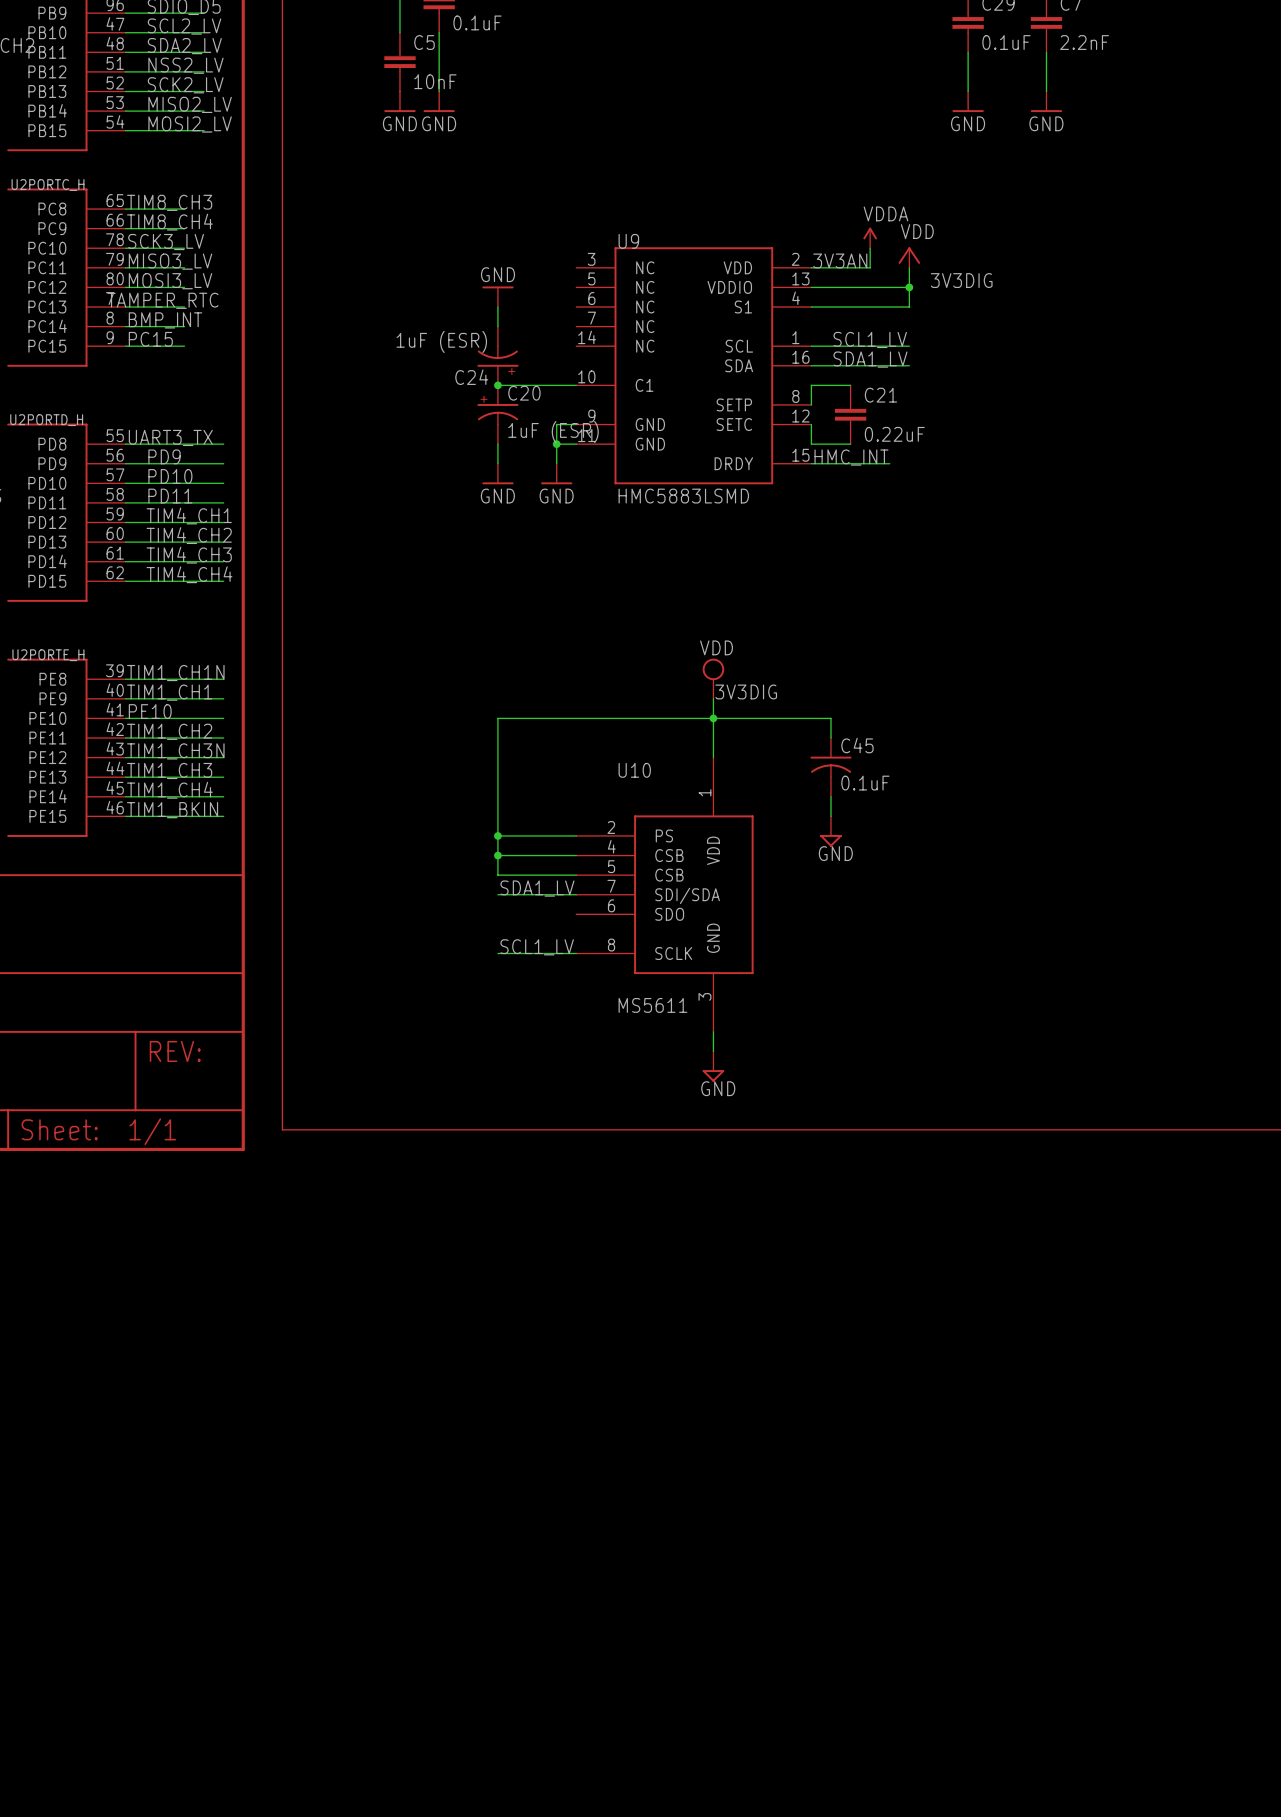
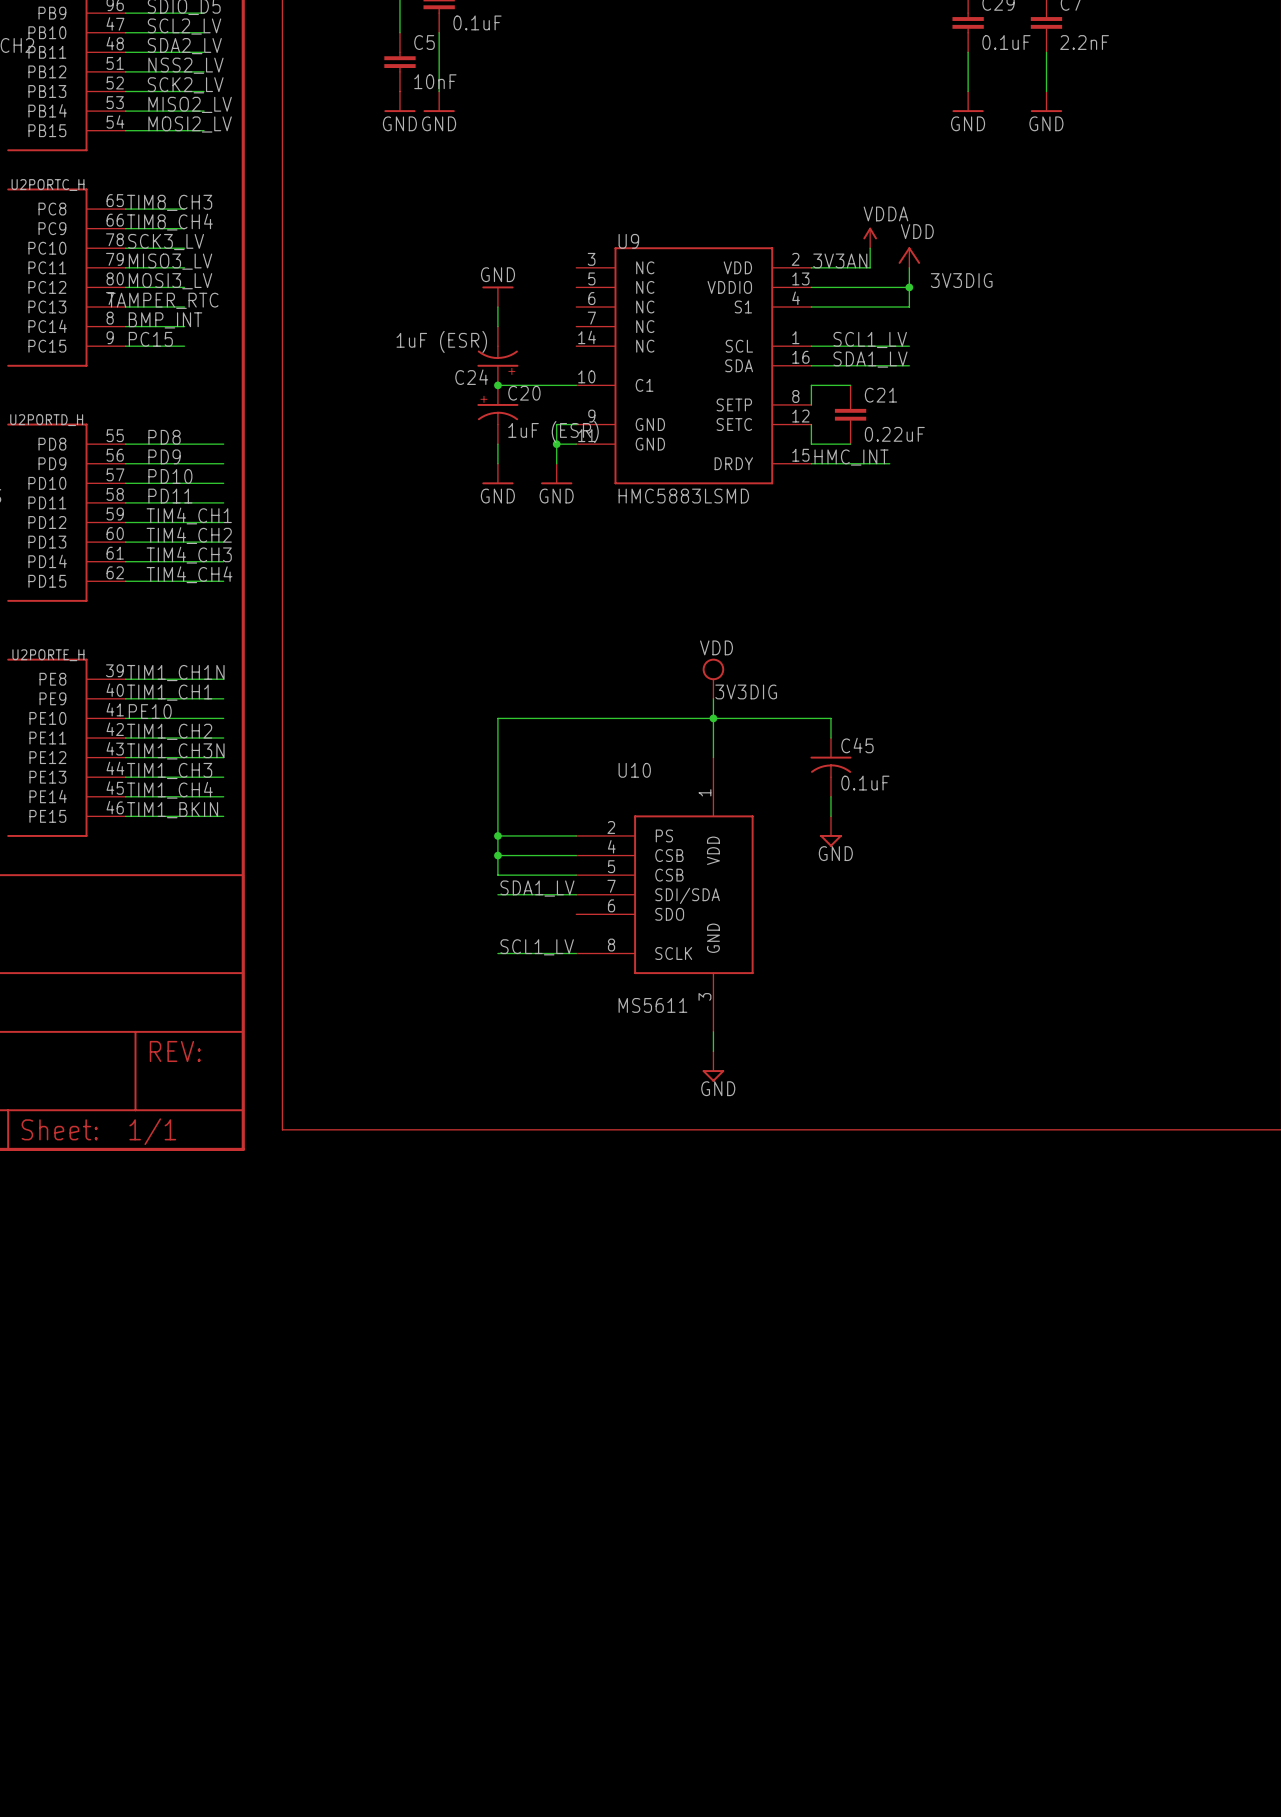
label: none -> PD8 (164, 437)
label: UART3_TX (170, 437) -> none

